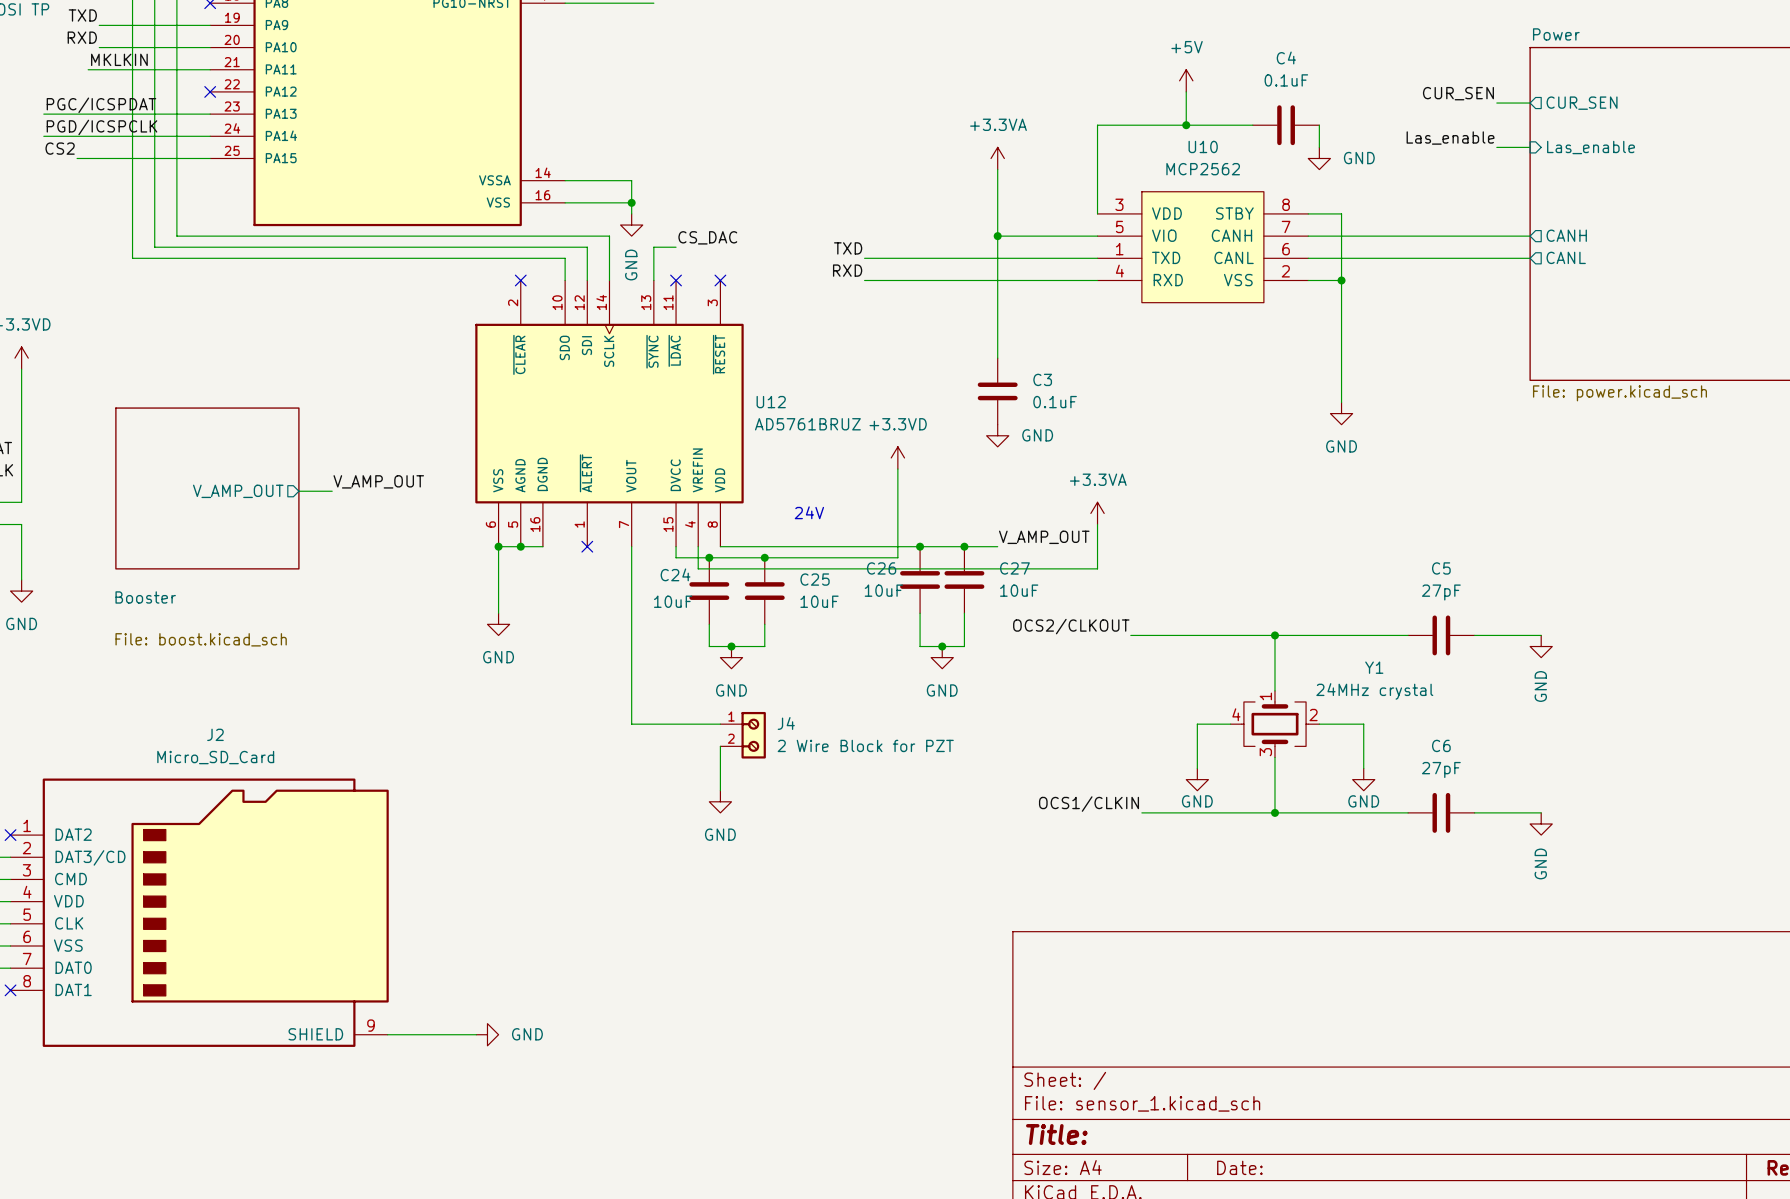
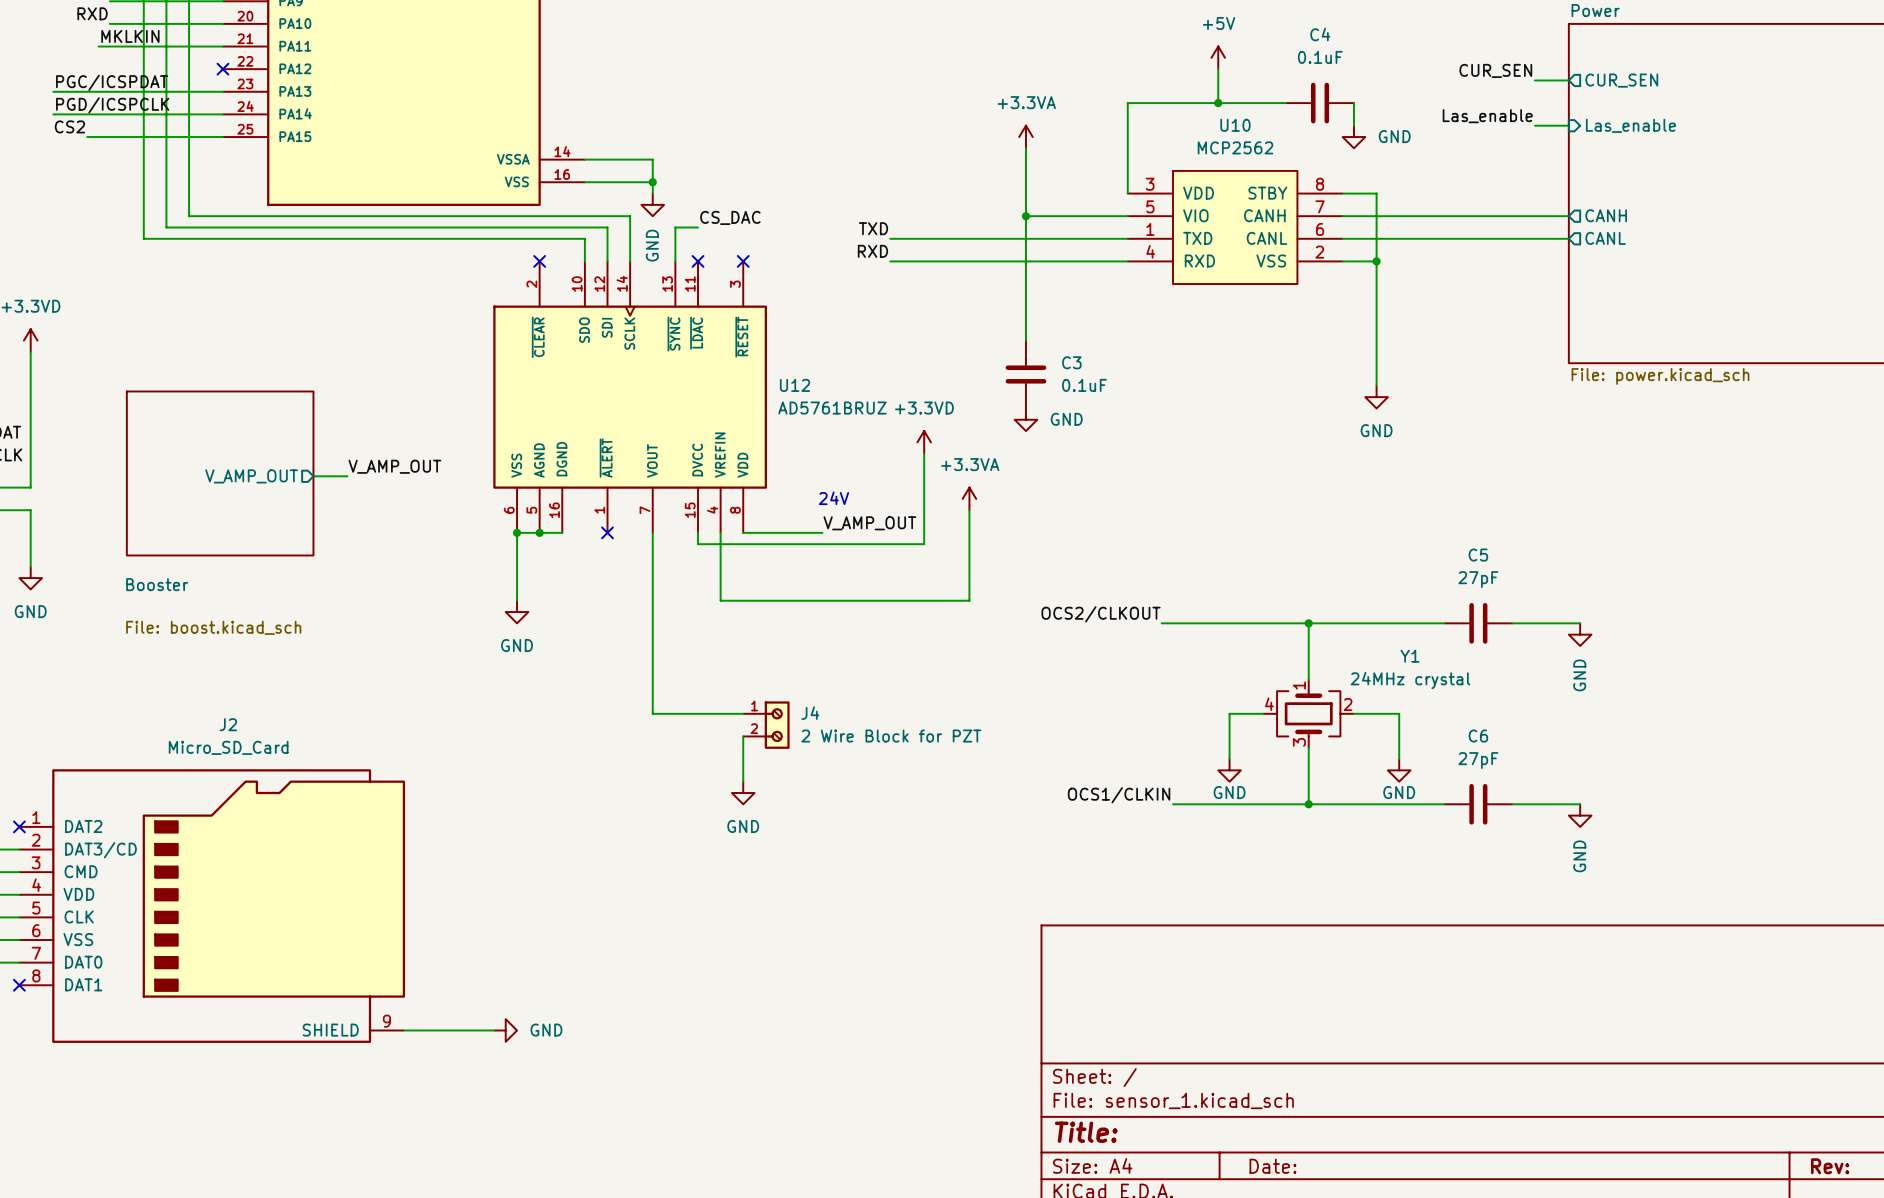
power symbol position: +3.3VA (1097, 513) -> +3.3VA (969, 498)
wire: (1097, 524) (1097, 568) (698, 568) -> (969, 510) (969, 600) (720, 600) (720, 555)
label position: V_AMP_OUT (1044, 537) -> V_AMP_OUT (869, 523)
wire: (798, 546) (997, 546) -> none
junction: (920, 546) -> none
junction: (964, 546) -> none
junction: (709, 557) -> none
junction: (764, 557) -> none
C26: 10uF (920, 579) -> none
C27: 10uF (964, 579) -> none
C24: 10uF (709, 591) -> none
C25: 10uF (764, 591) -> none
wire: (920, 613) (920, 646) (964, 646) (964, 613) -> none
wire: (709, 624) (709, 646) (764, 646) (764, 624) -> none
junction: (731, 646) -> none
junction: (942, 646) -> none
power symbol: GND (731, 657) -> none
power symbol: GND (942, 657) -> none

